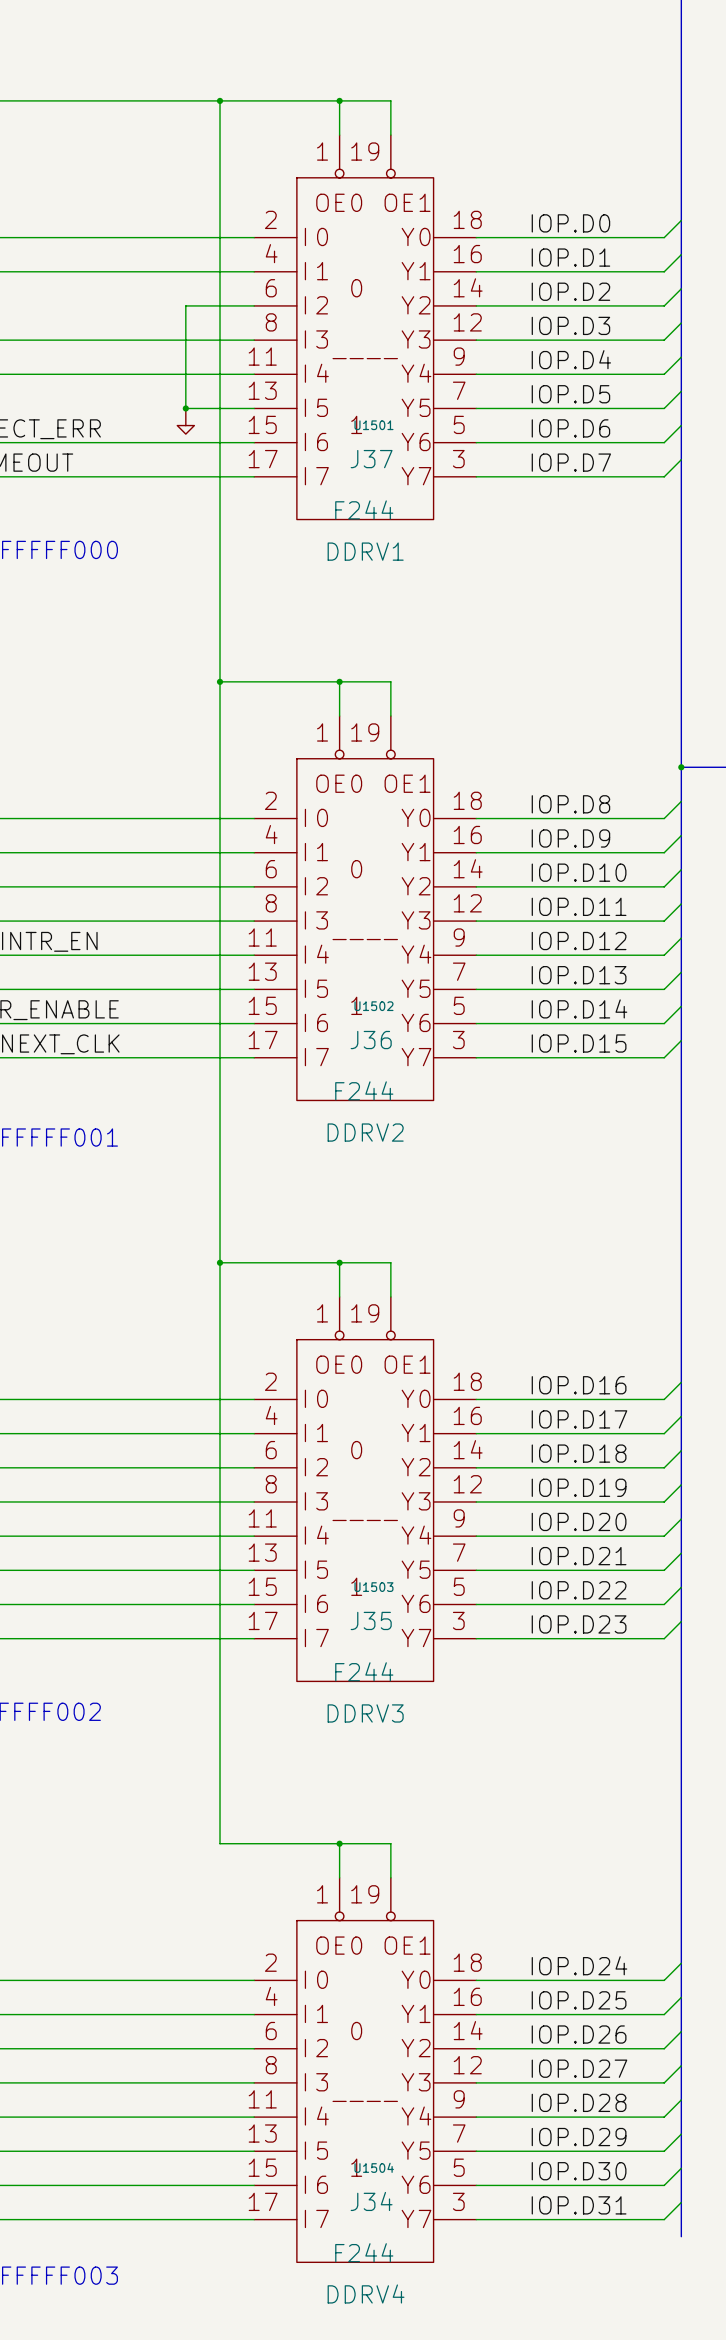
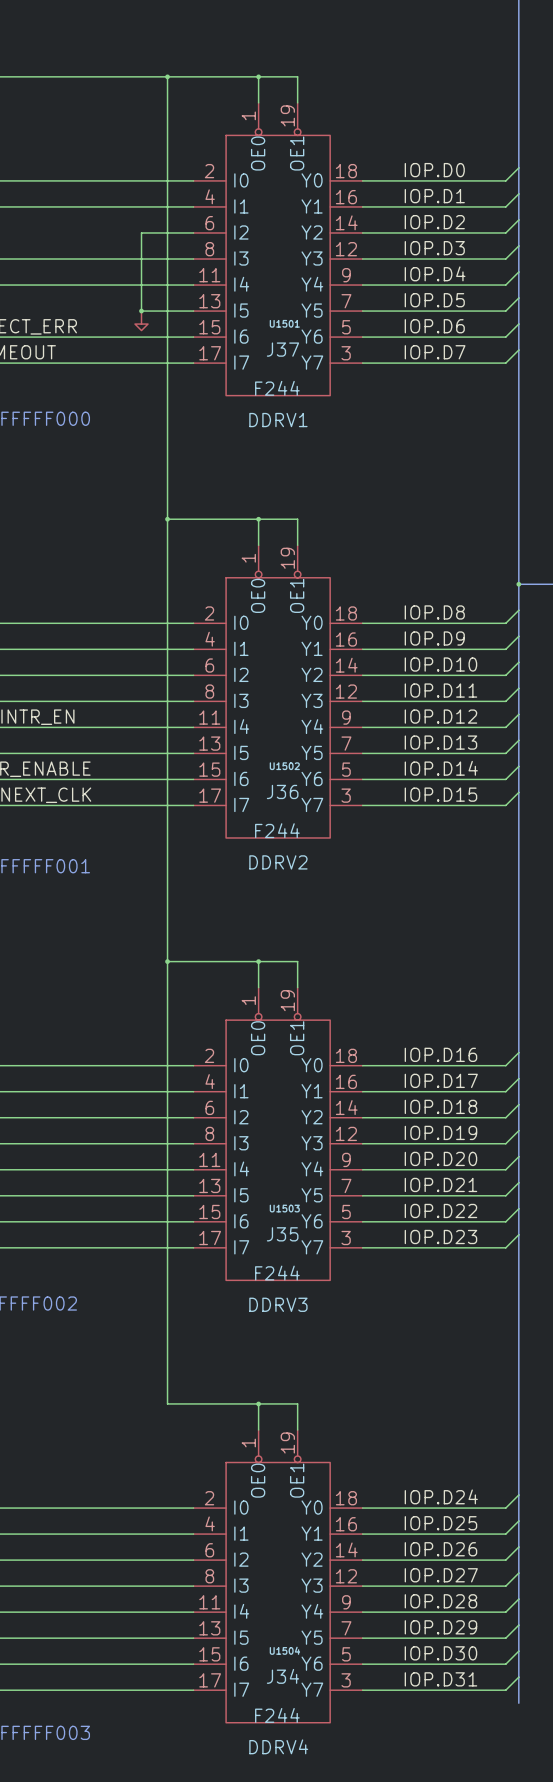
U1501 symbol: [254, 135, 477, 520] -> [193, 102, 363, 396]
U1502 symbol: [254, 716, 477, 1101] -> [193, 545, 363, 838]
U1503 symbol: [254, 1296, 477, 1682] -> [193, 987, 363, 1281]
U1504 symbol: [254, 1877, 477, 2263] -> [193, 1429, 363, 1723]

